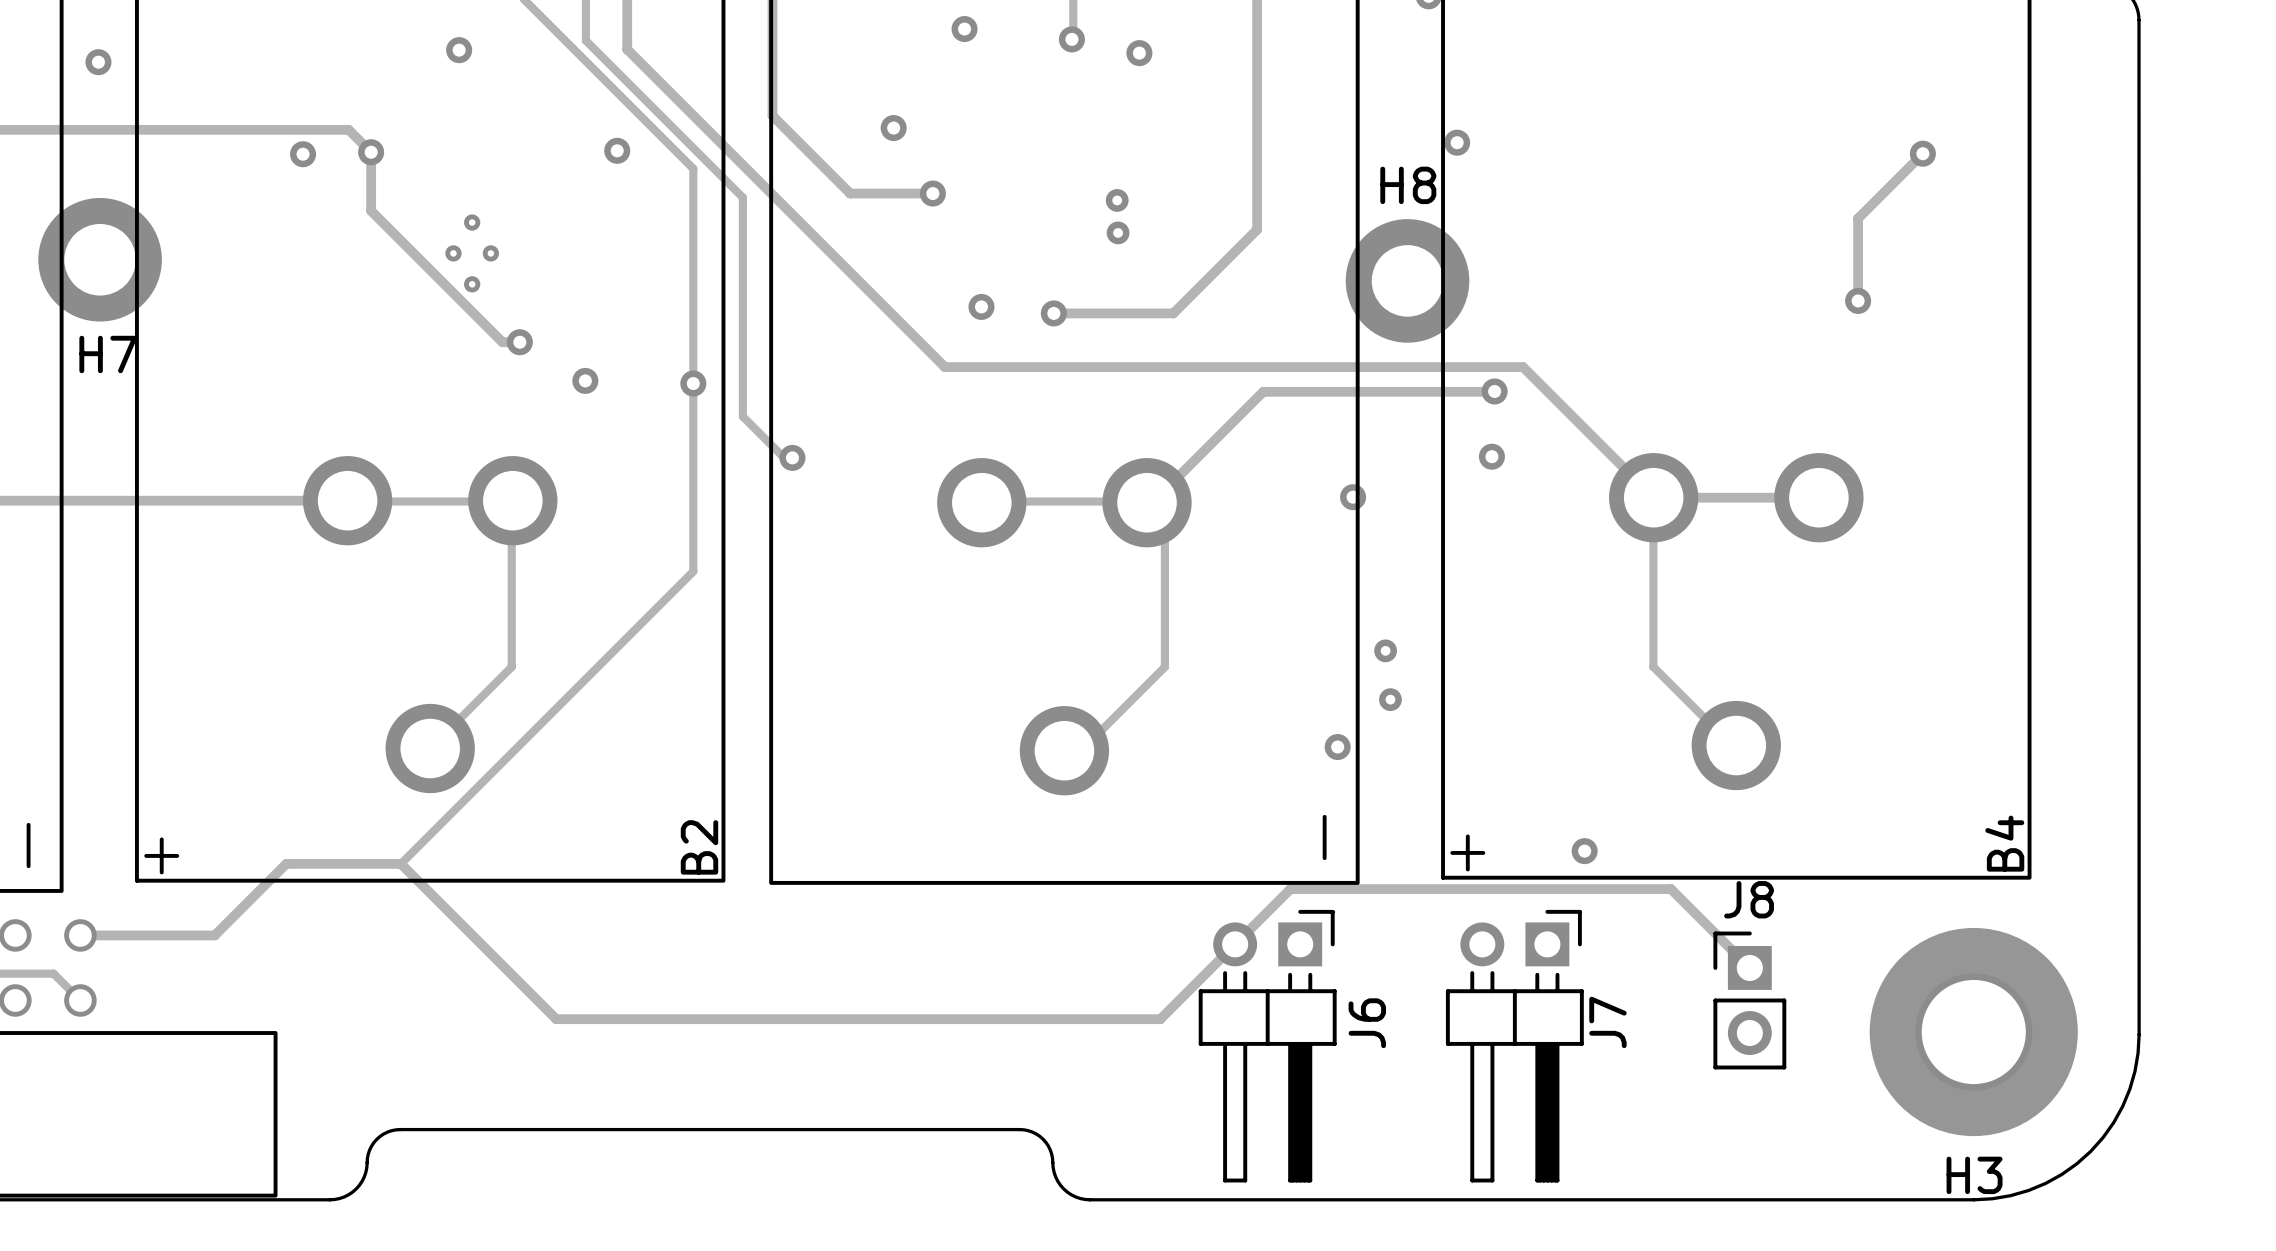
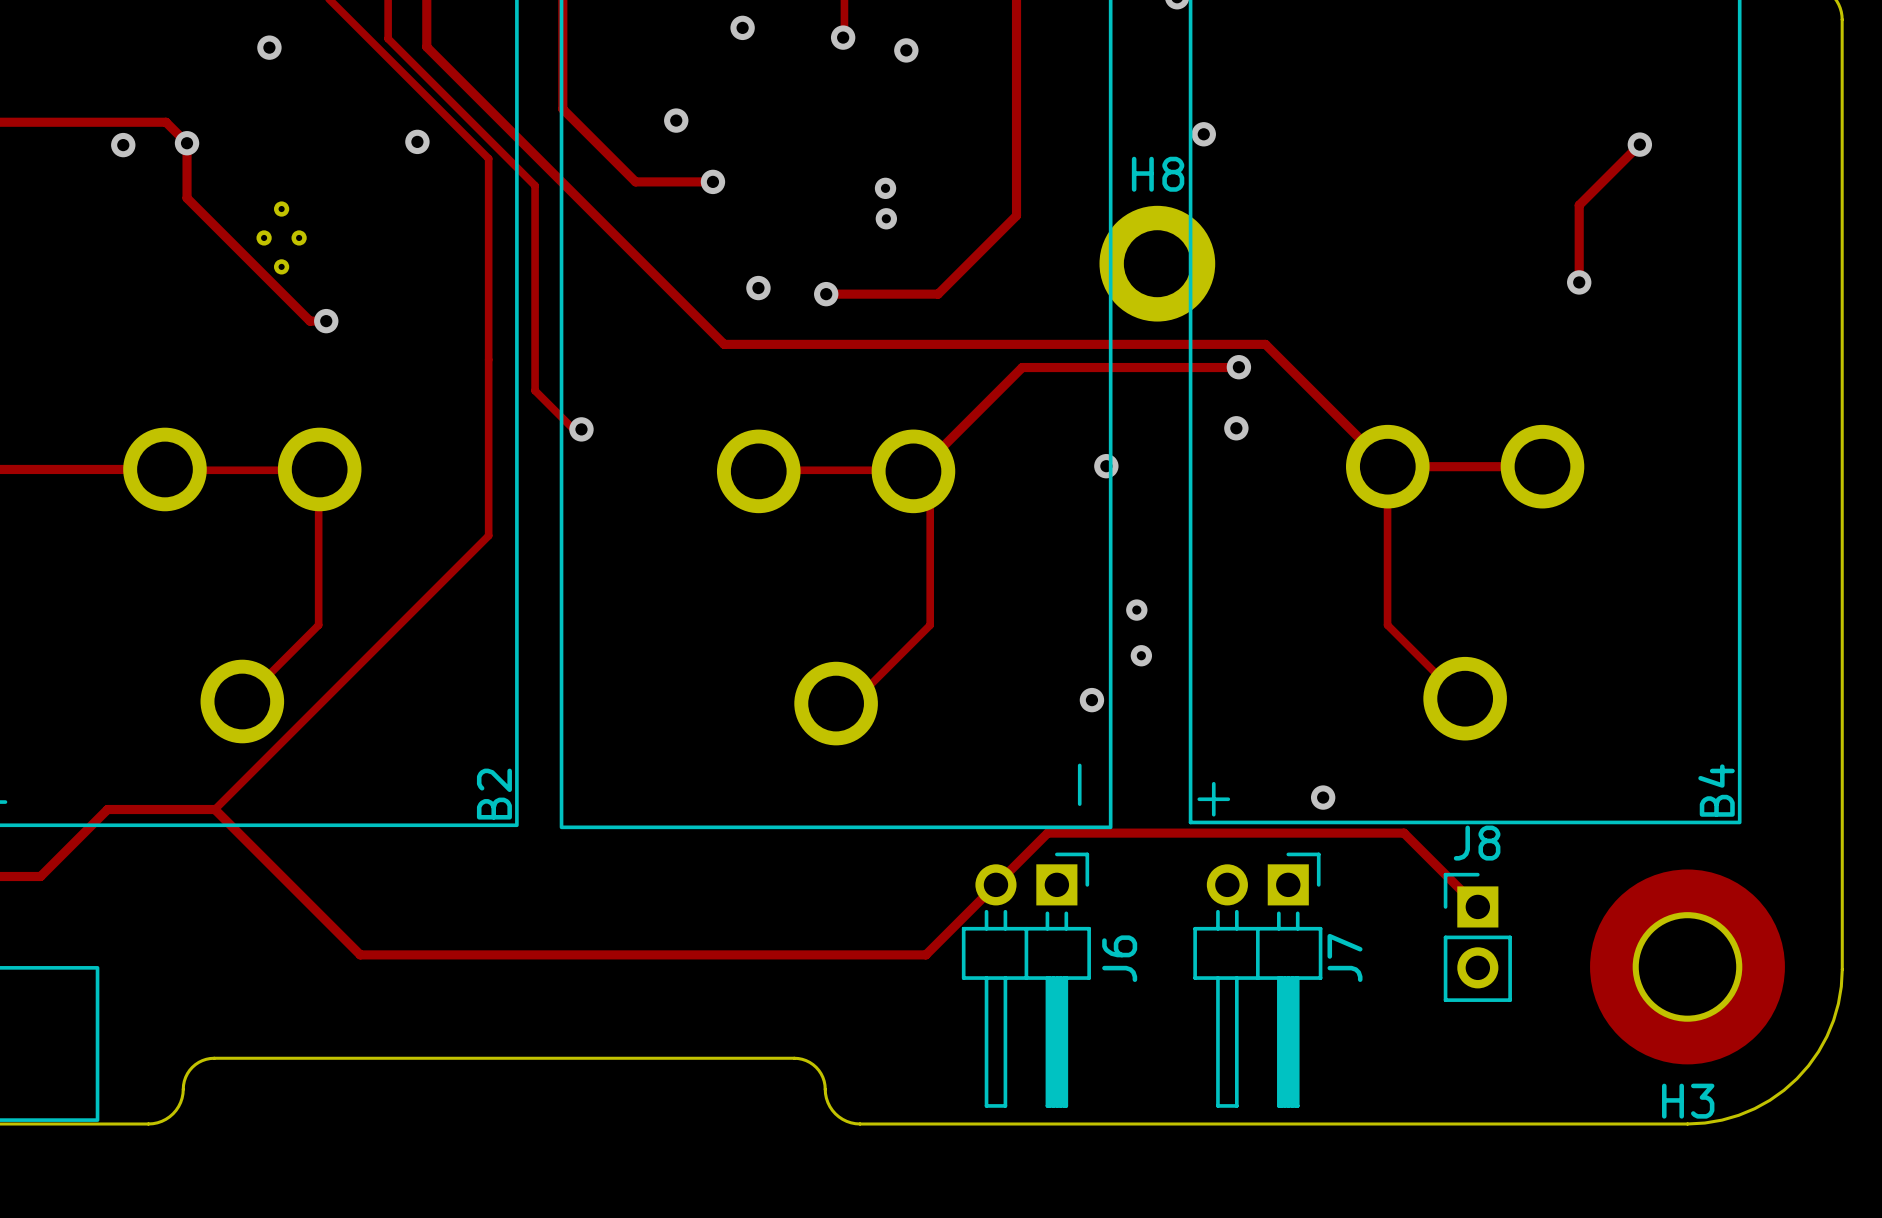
via: (585, 380) -> none
via: (693, 383) -> none

